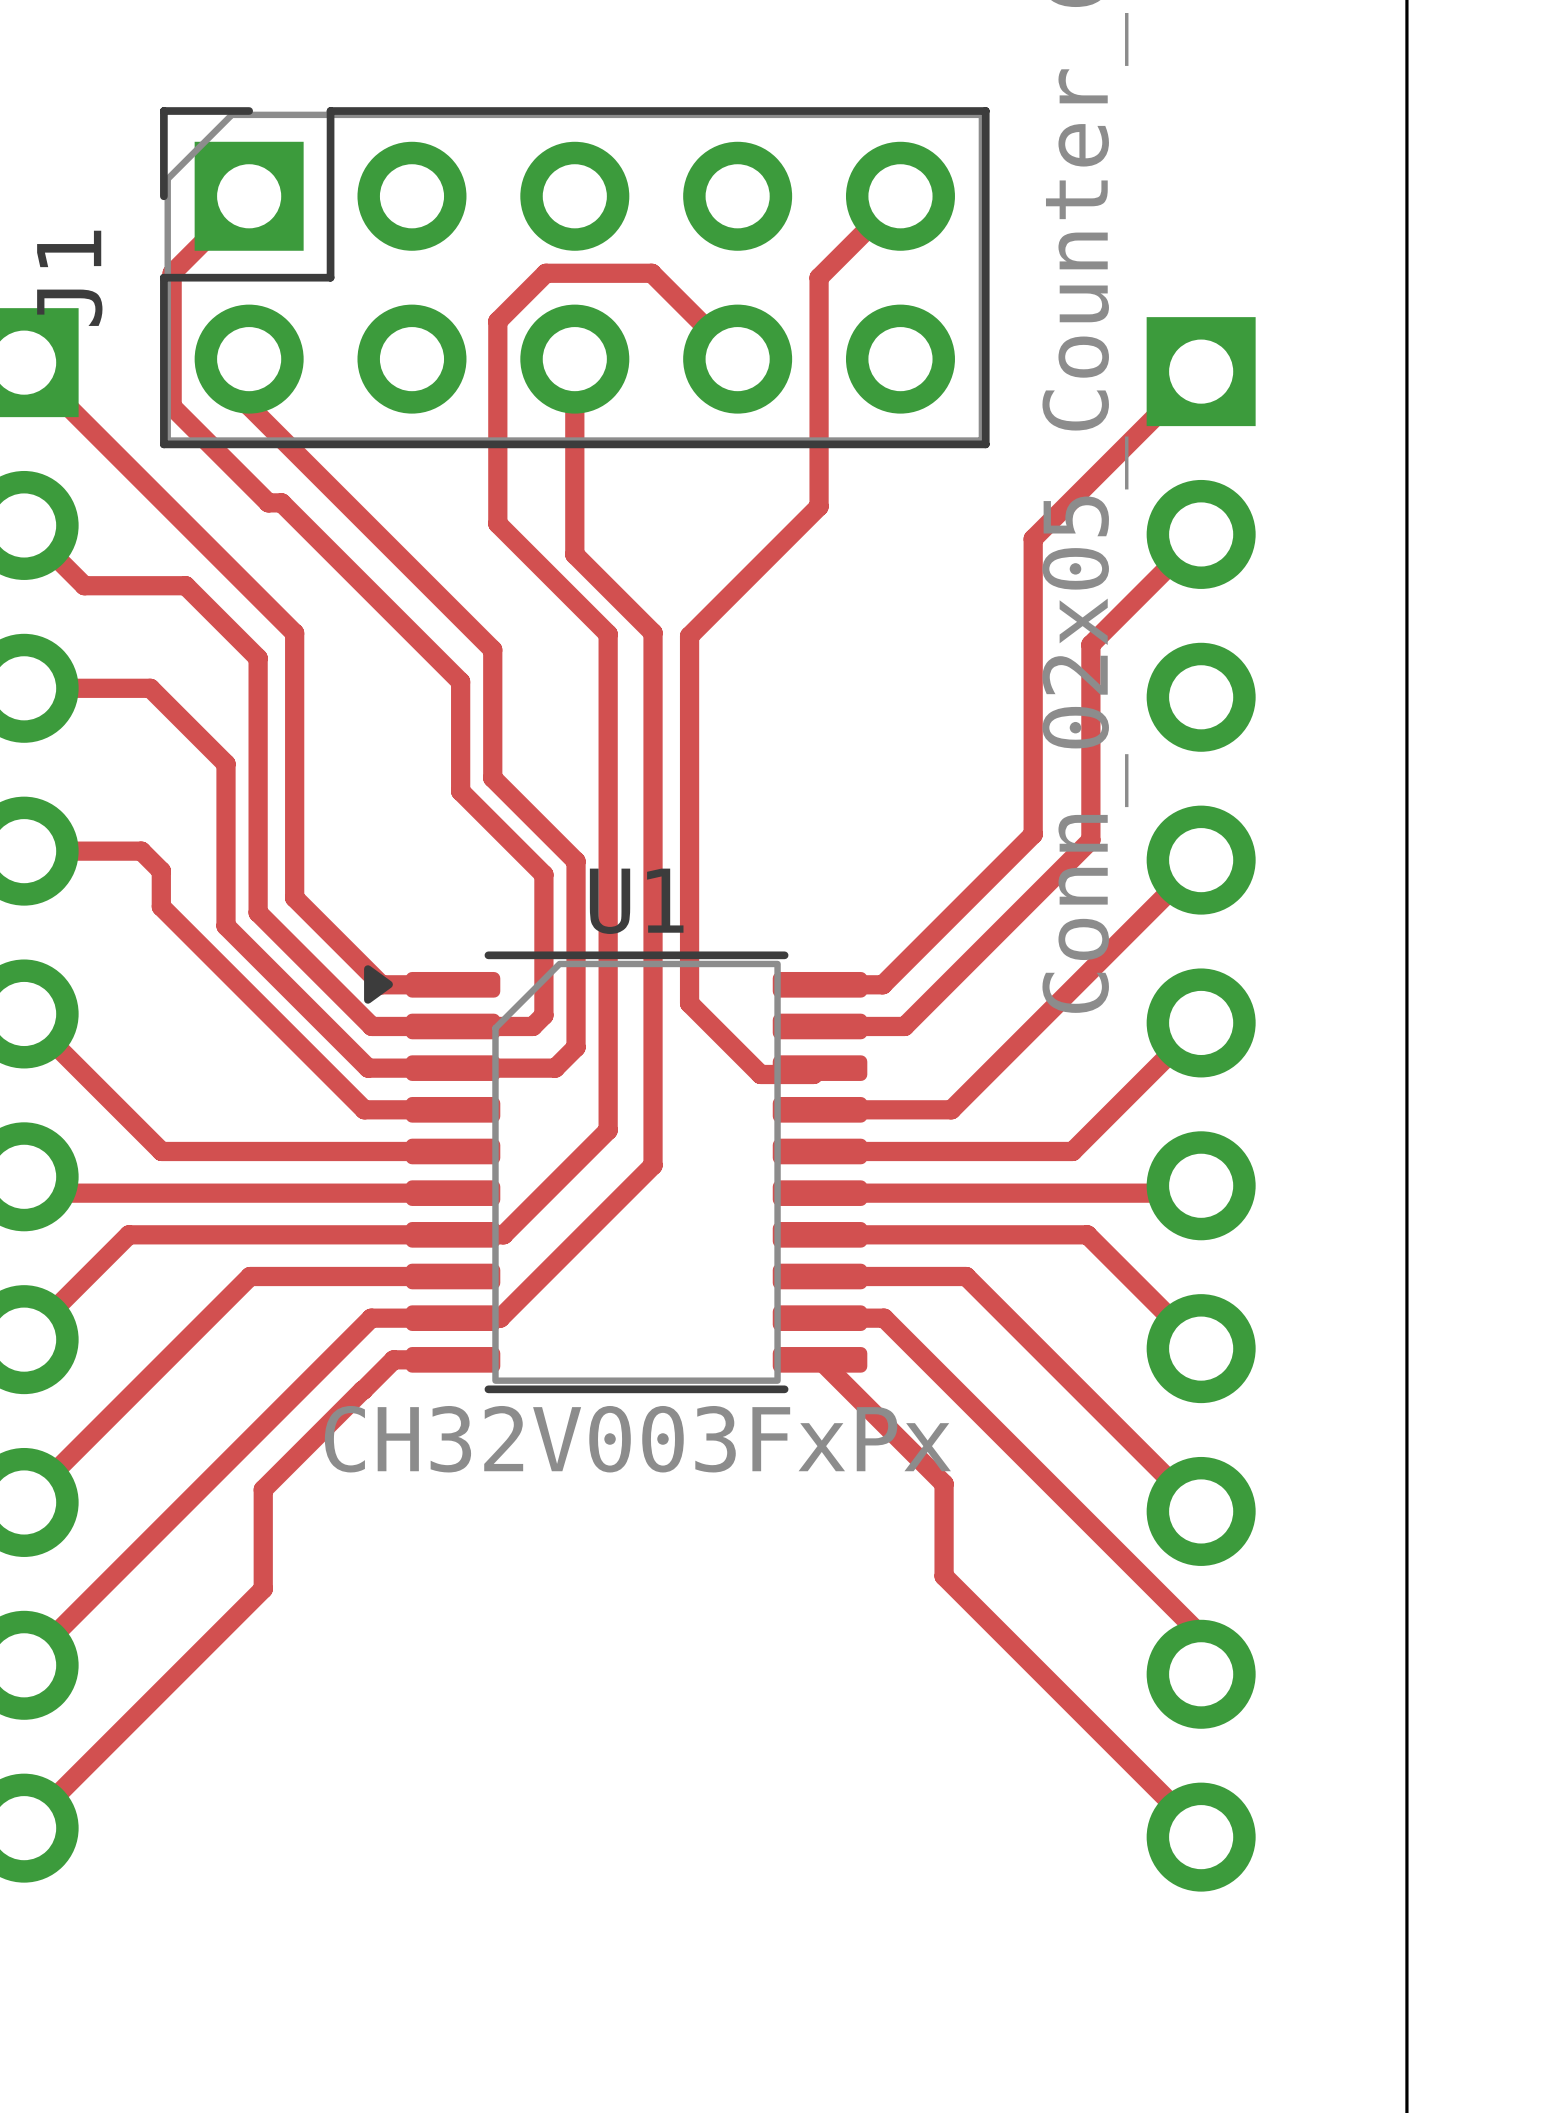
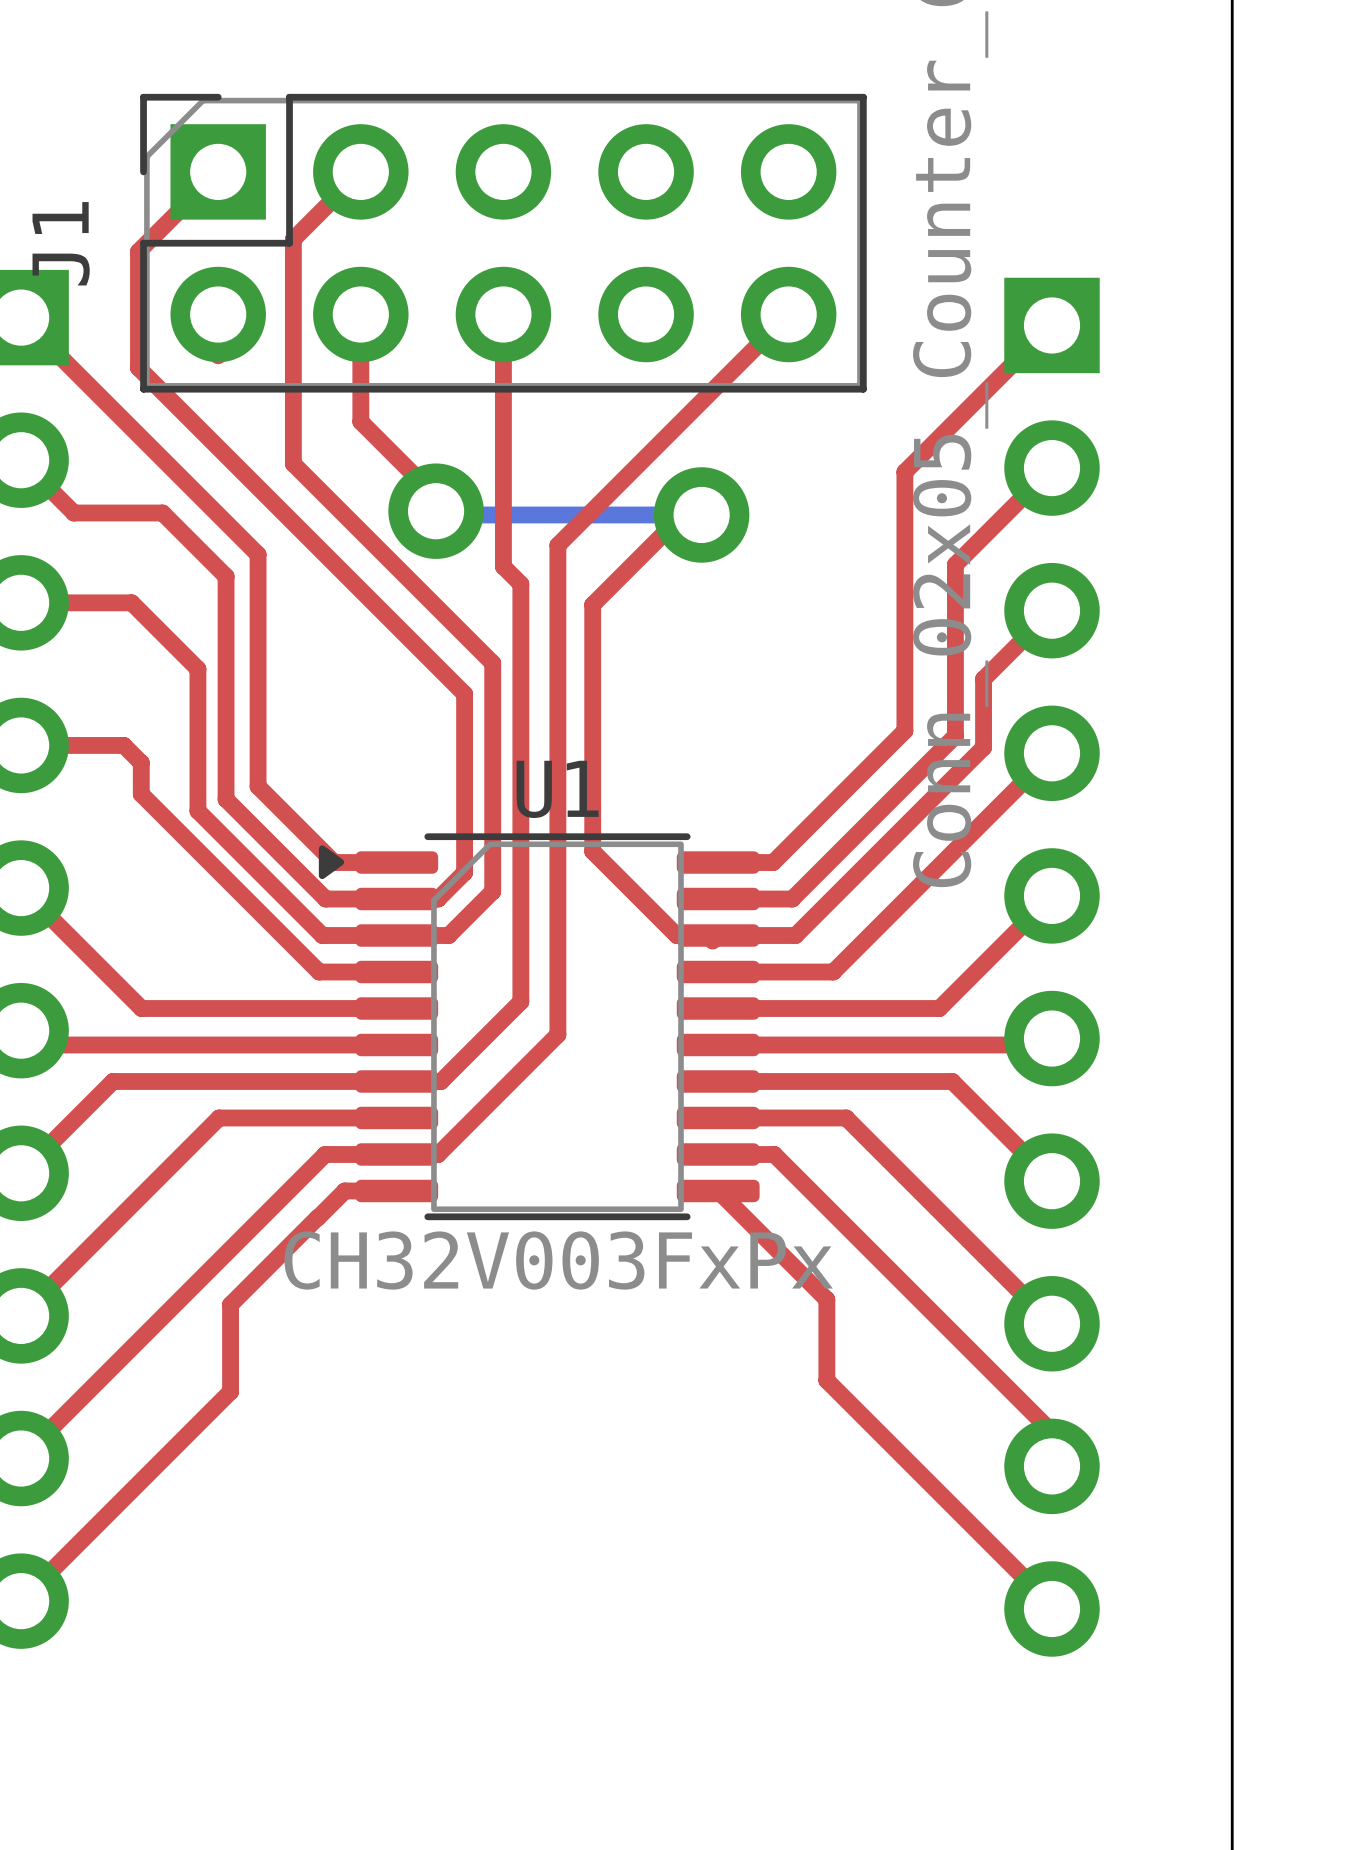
top track: (900, 196) (819, 277) (819, 506) (689, 636) (689, 1003) (760, 1074) (813, 1074) -> none
top track: (172, 273) (172, 406) (268, 502) (281, 502) (460, 681) (460, 791) (543, 874) (543, 1015) (532, 1026) (500, 1026) -> (150, 239) (138, 251) (138, 367) (464, 693) (464, 872) (438, 899)
top track: none -> (360, 314) (360, 421) (436, 497) (436, 511)
top track: (737, 359) (651, 273) (545, 273) (497, 321) (497, 523) (608, 634) (608, 1130) (594, 1143) -> none
top track: none -> (788, 314) (557, 545) (557, 1034)
top track: (249, 406) (492, 649) (492, 778) (576, 861) (576, 1047) (555, 1068) (512, 1068) -> (360, 171) (293, 239) (293, 463) (492, 663) (492, 891) (448, 935)
top track: (574, 554) (653, 632) (653, 1165) (637, 1181) -> (503, 485) (503, 566) (520, 584) (520, 1001)
bottom track: none -> (436, 511) (450, 511) (454, 514) (701, 514)
via: none -> (436, 511)
top track: none -> (701, 514) (682, 514) (592, 604) (592, 851) (676, 935) (795, 935) (983, 747) (983, 679) (1052, 610)
via: none -> (701, 514)

